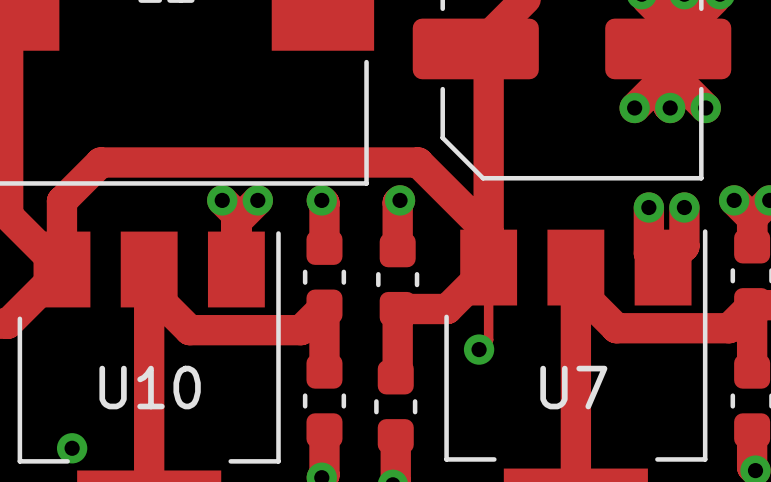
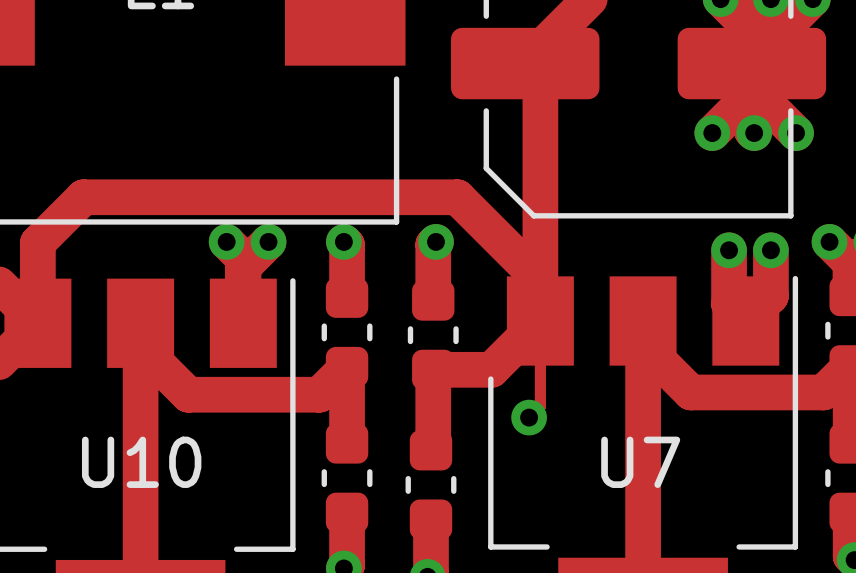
via: (72, 448) -> none

